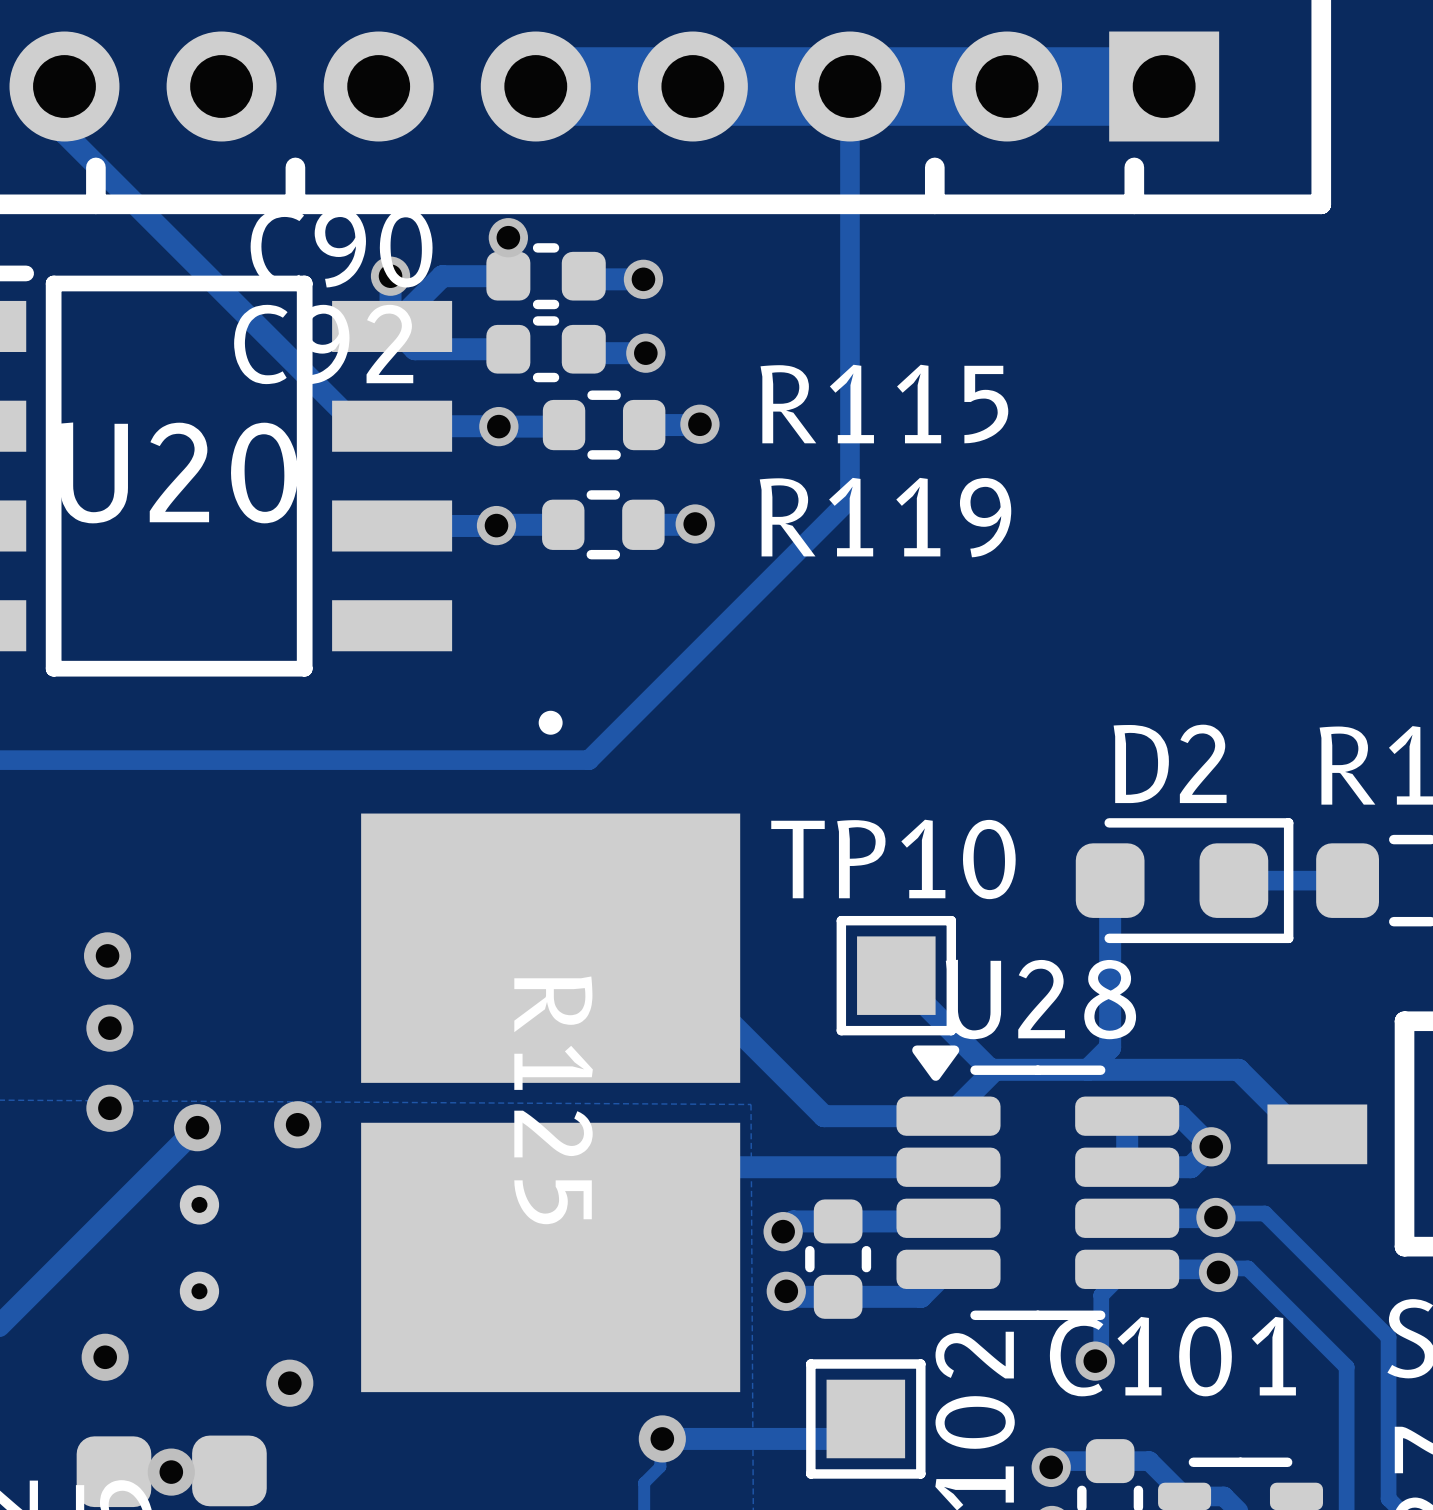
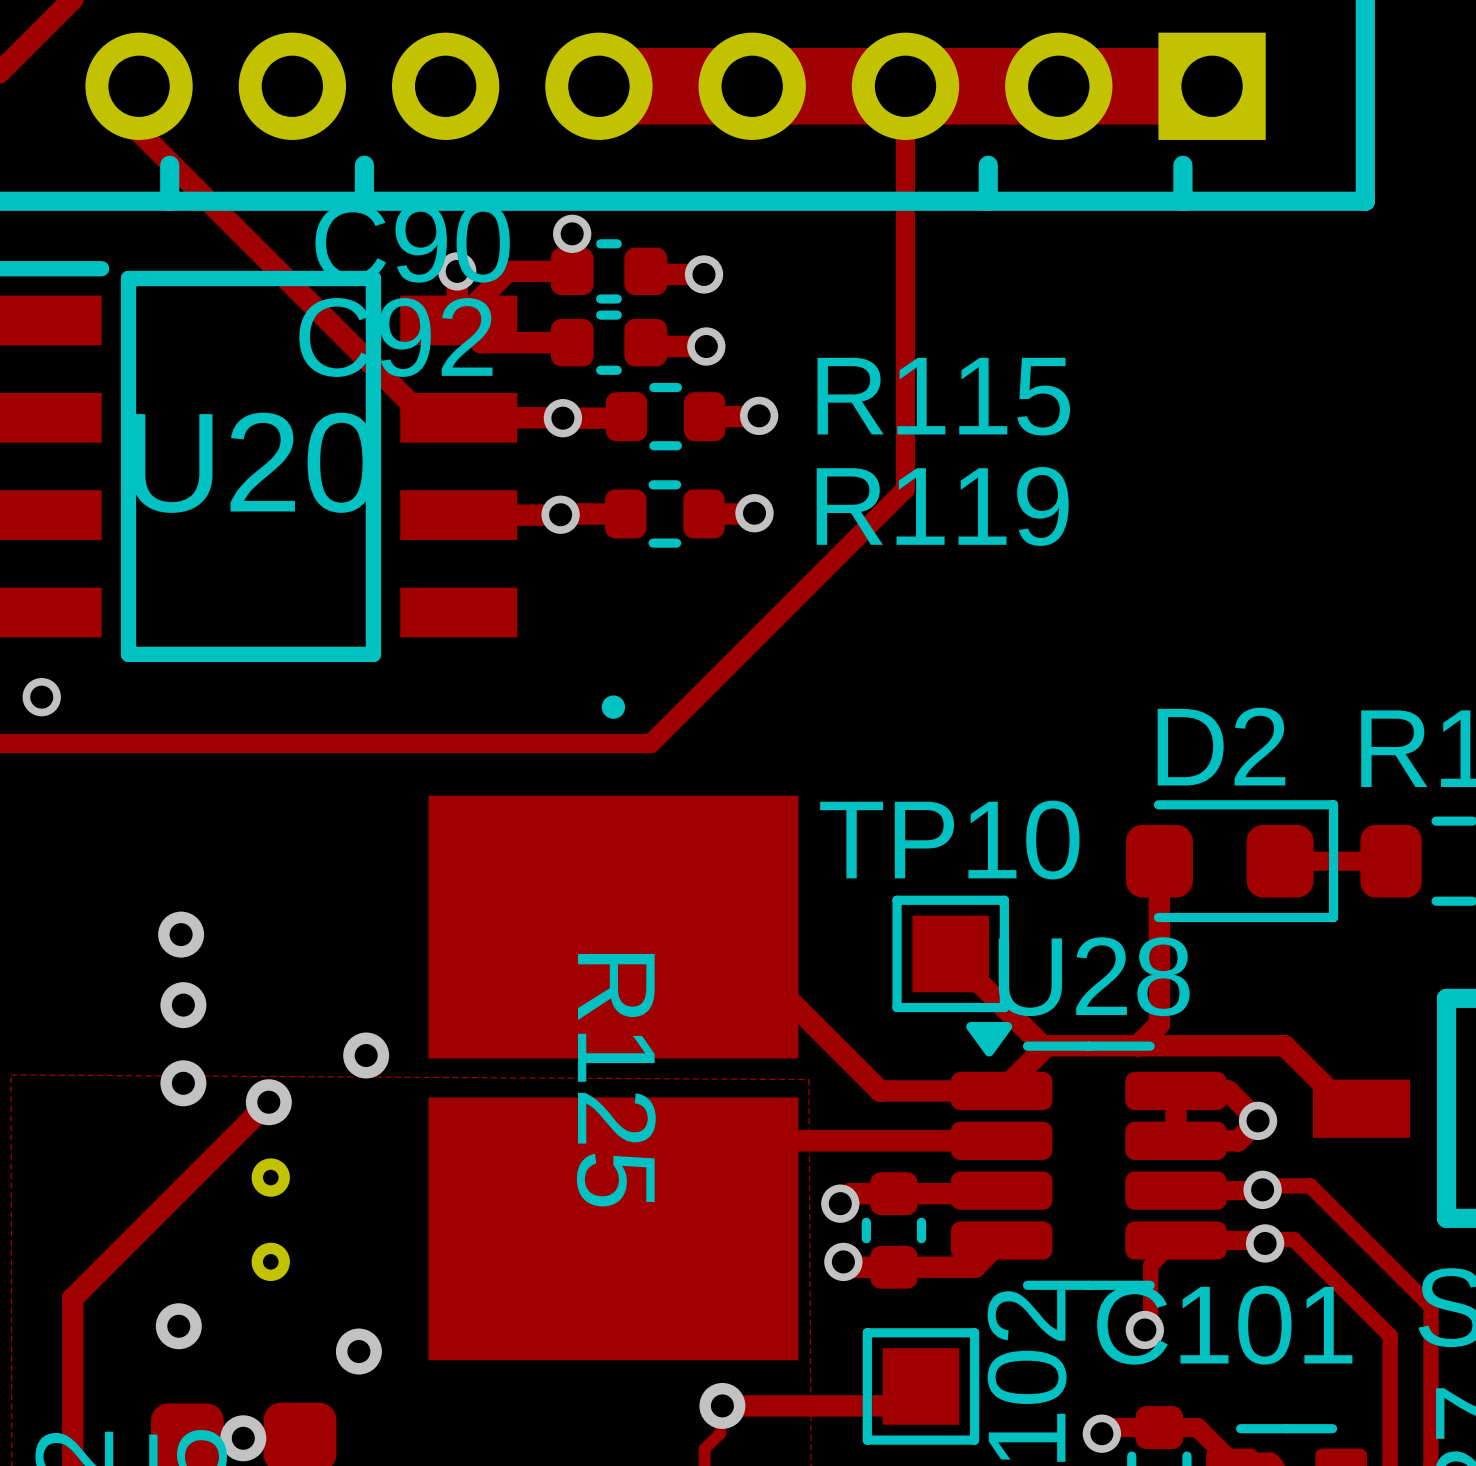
via position: (297, 1124) -> (366, 1055)

